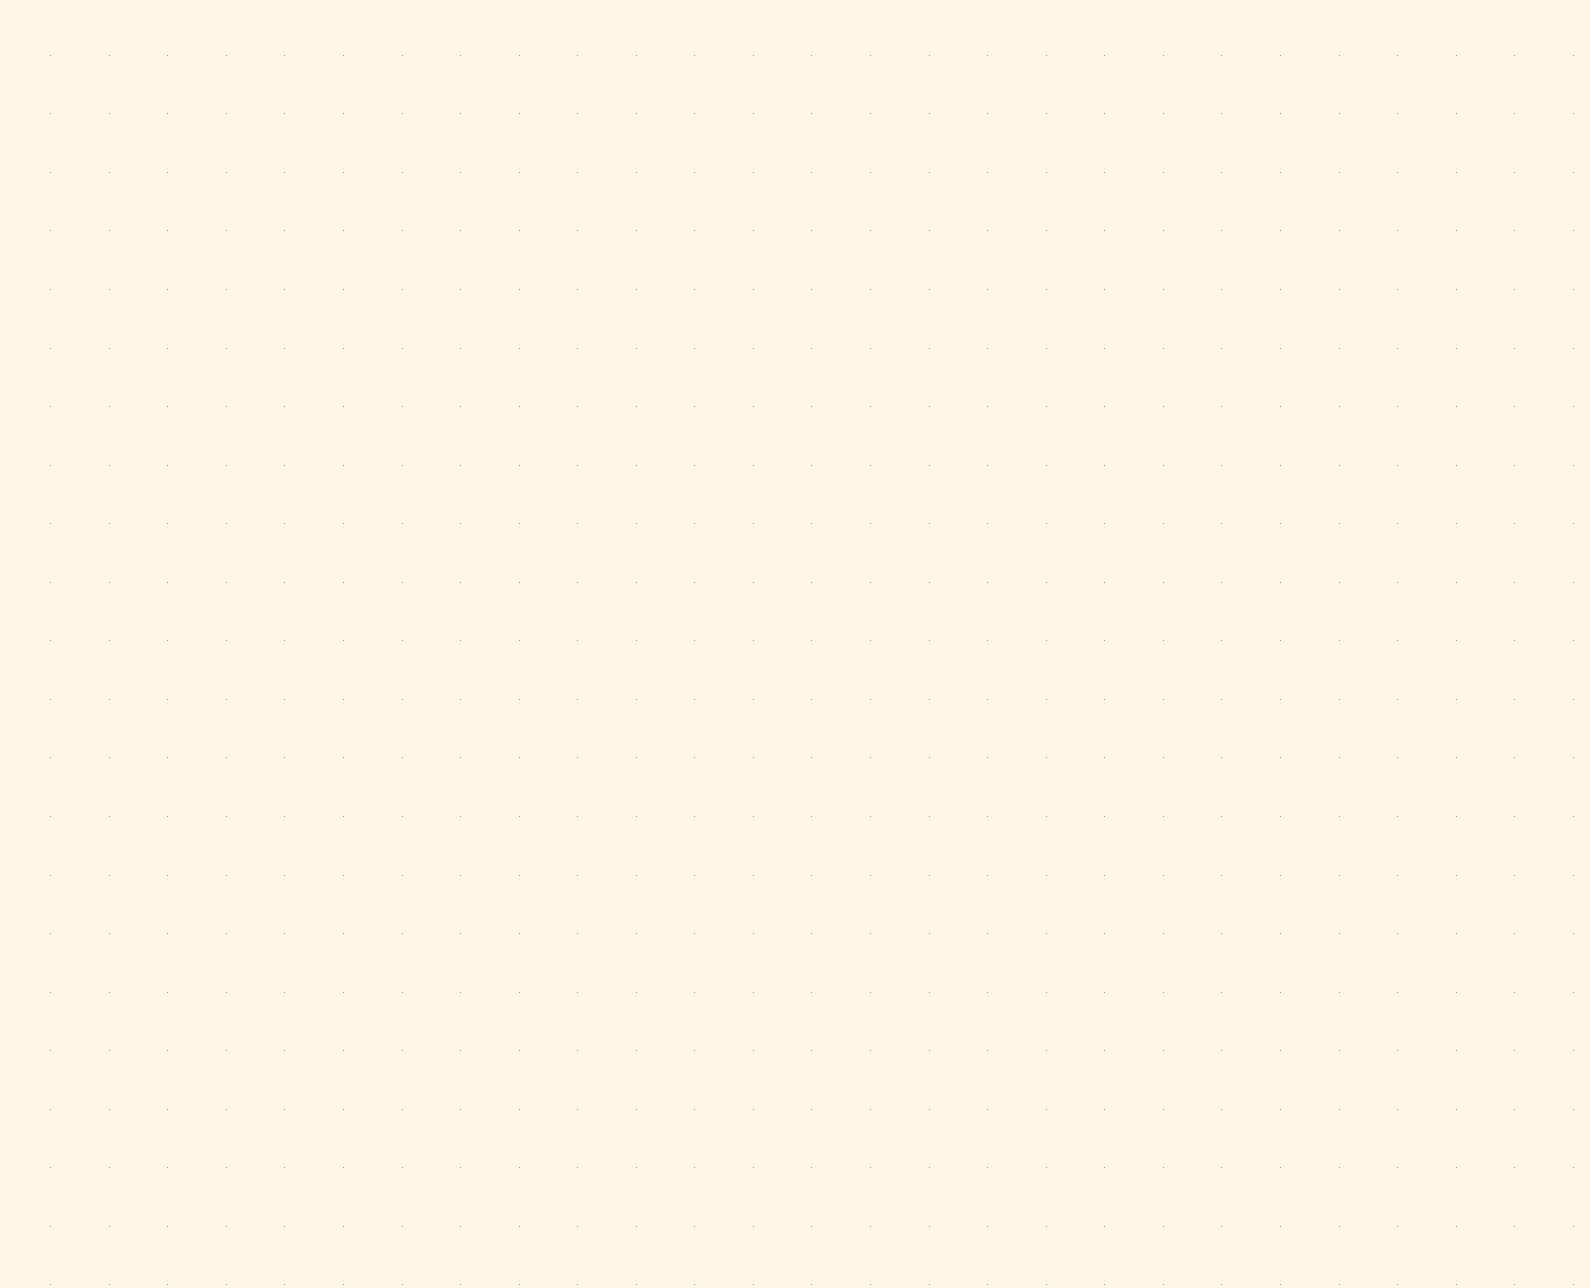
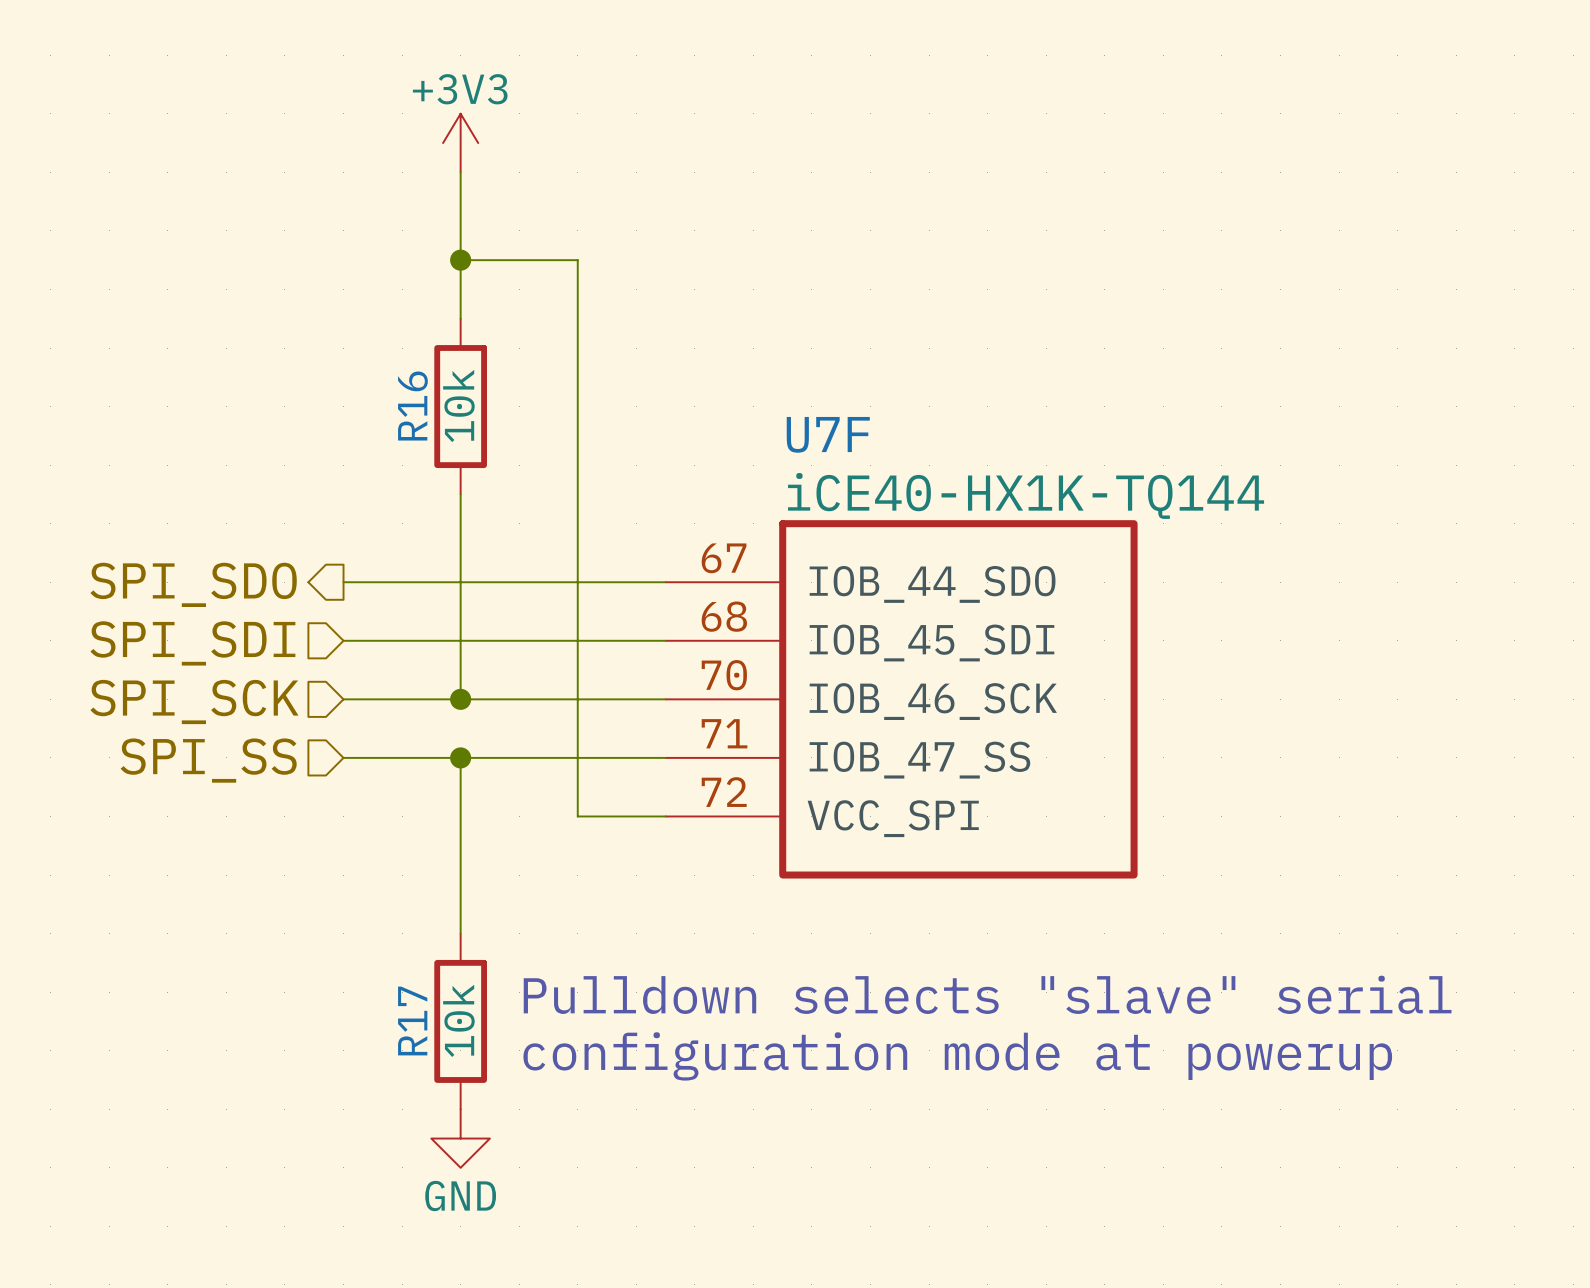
power symbol: none -> +3V3 (460, 143)
wire: none -> (460, 172) (460, 318)
wire: none -> (460, 260) (577, 260) (577, 816) (665, 816)
junction: none -> (460, 260)
R16: none -> 10k (460, 406)
wire: none -> (460, 494) (460, 699)
wire: none -> (343, 582) (665, 582)
hierarchical label: none -> SPI_SDO (193, 584)
wire: none -> (343, 640) (665, 640)
hierarchical label: none -> SPI_SDI (192, 643)
wire: none -> (343, 699) (665, 699)
junction: none -> (460, 699)
U7F: none -> iCE40-HX1K-TQ144 (901, 699)
hierarchical label: none -> SPI_SCK (194, 701)
wire: none -> (343, 757) (665, 757)
wire: none -> (460, 757) (460, 933)
junction: none -> (460, 757)
hierarchical label: none -> SPI_SS (208, 760)
text: none -> Pulldown selects "slave" serial (987, 994)
R17: none -> 10k (460, 1021)
text: none -> configuration mode at powerup (957, 1056)
power symbol: none -> GND (460, 1138)

